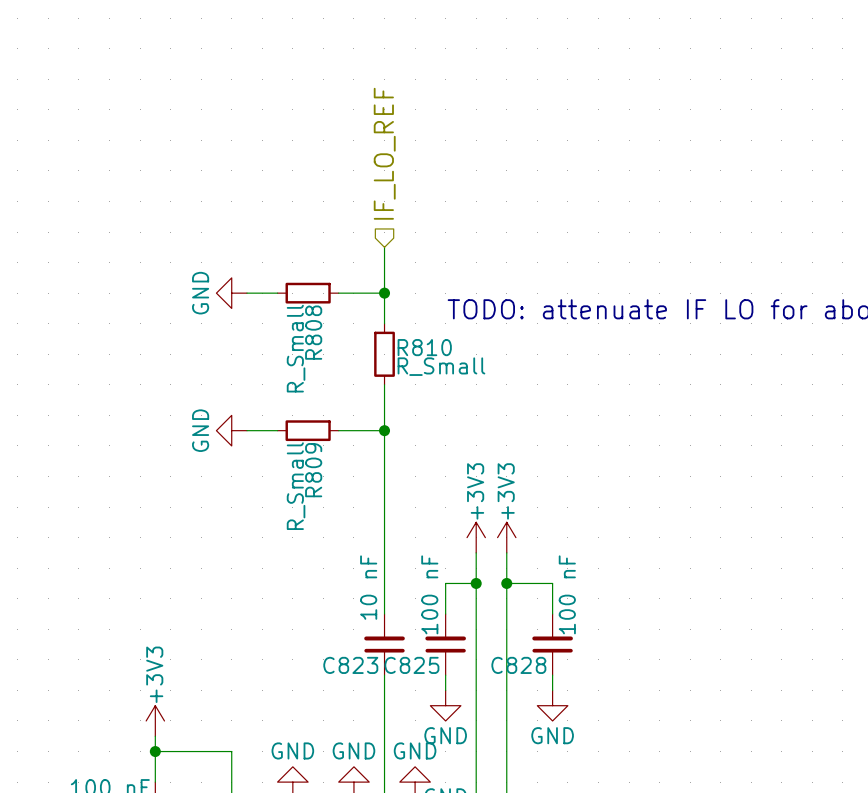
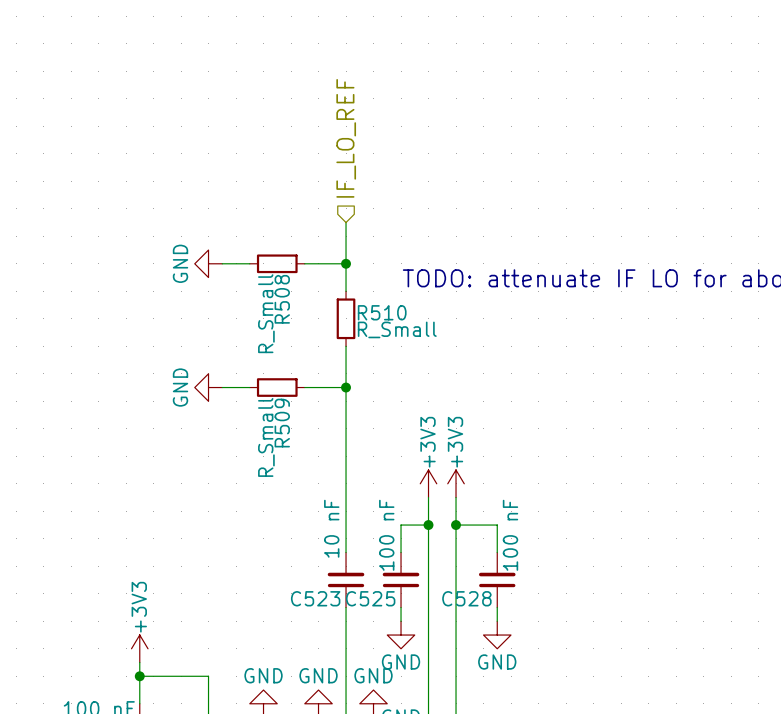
R808 name: R808 (313, 332) -> R508 (282, 299)
R810 name: R810 (424, 347) -> R510 (382, 312)
R809 name: R809 (313, 470) -> R509 (282, 423)
C823 name: C823 (350, 665) -> C523 (315, 598)
C825 name: C825 (411, 665) -> C525 (370, 598)
C828 name: C828 (518, 665) -> C528 (466, 598)

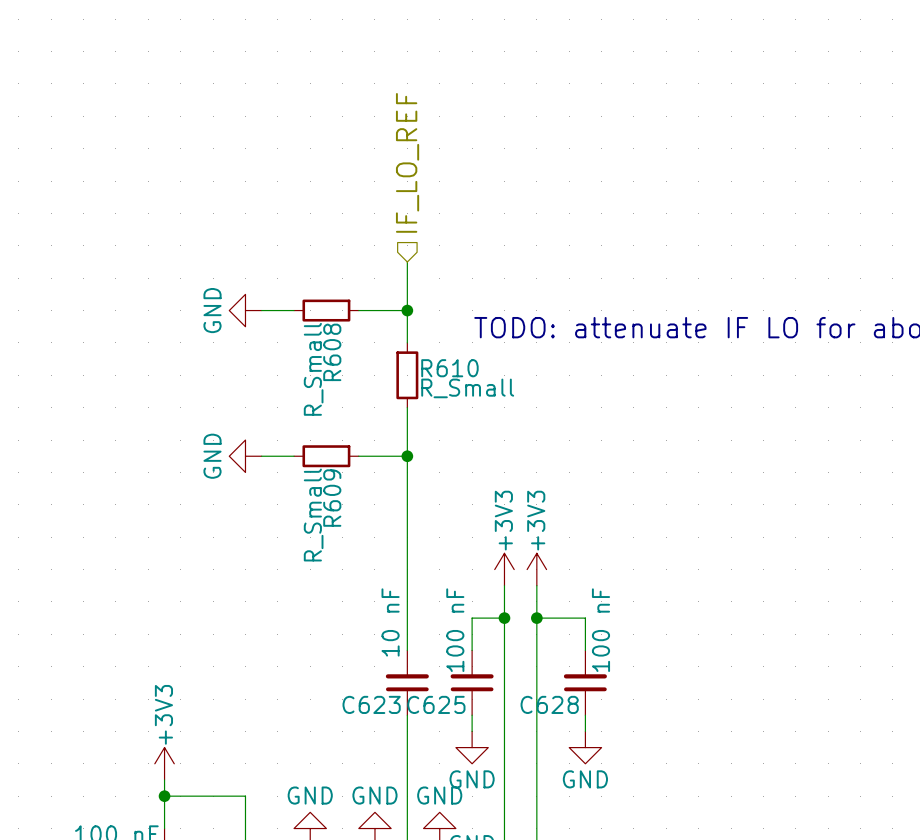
R508 name: R508 (282, 299) -> R608 (332, 352)
R510 name: R510 (382, 312) -> R610 (449, 368)
R509 name: R509 (282, 423) -> R609 (332, 498)
C523 name: C523 (315, 598) -> C623 (371, 704)
C525 name: C525 (370, 598) -> C625 (436, 704)
C528 name: C528 (466, 598) -> C628 (549, 704)

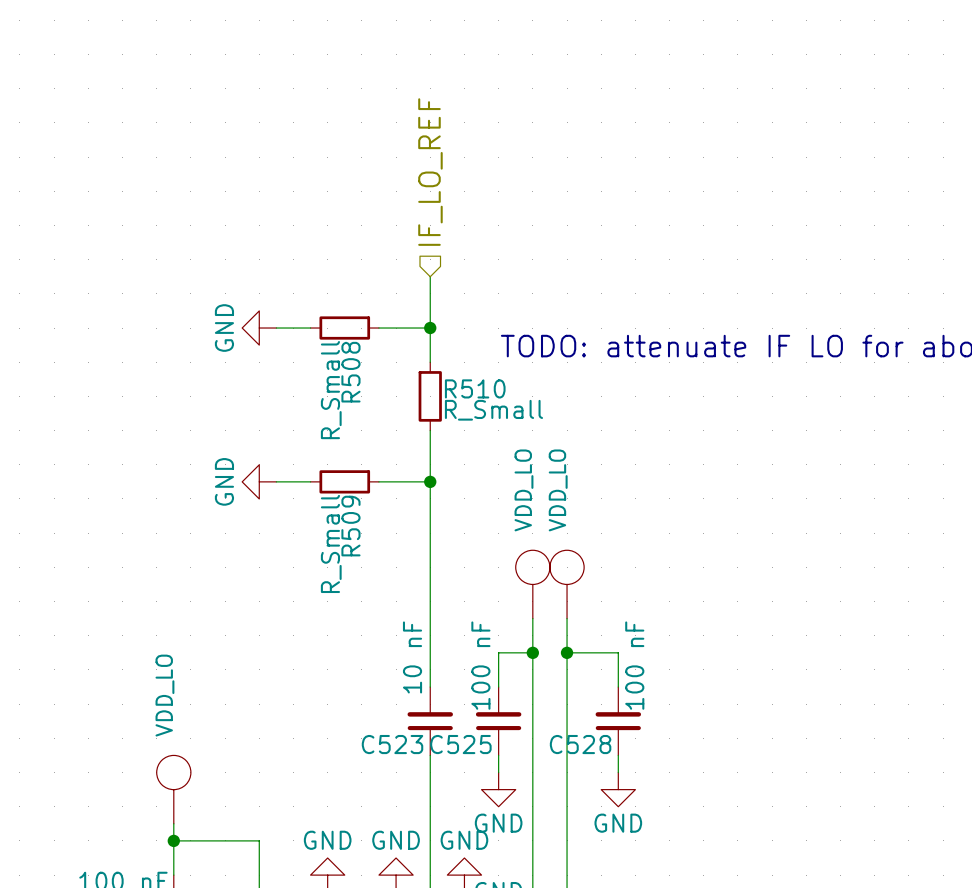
R608 name: R608 (332, 352) -> R508 (350, 372)
R610 name: R610 (449, 368) -> R510 (475, 388)
R609 name: R609 (332, 498) -> R509 (350, 526)
power symbol: none -> VDD_LO (532, 584)
power symbol: none -> VDD_LO (567, 584)
power symbol: +3V3 (504, 569) -> none
power symbol: +3V3 (536, 569) -> none
C623 name: C623 (371, 704) -> C523 (392, 744)
C625 name: C625 (436, 704) -> C525 (460, 744)
C628 name: C628 (549, 704) -> C528 (580, 744)
power symbol: none -> VDD_LO (173, 789)
power symbol: +3V3 (164, 763) -> none

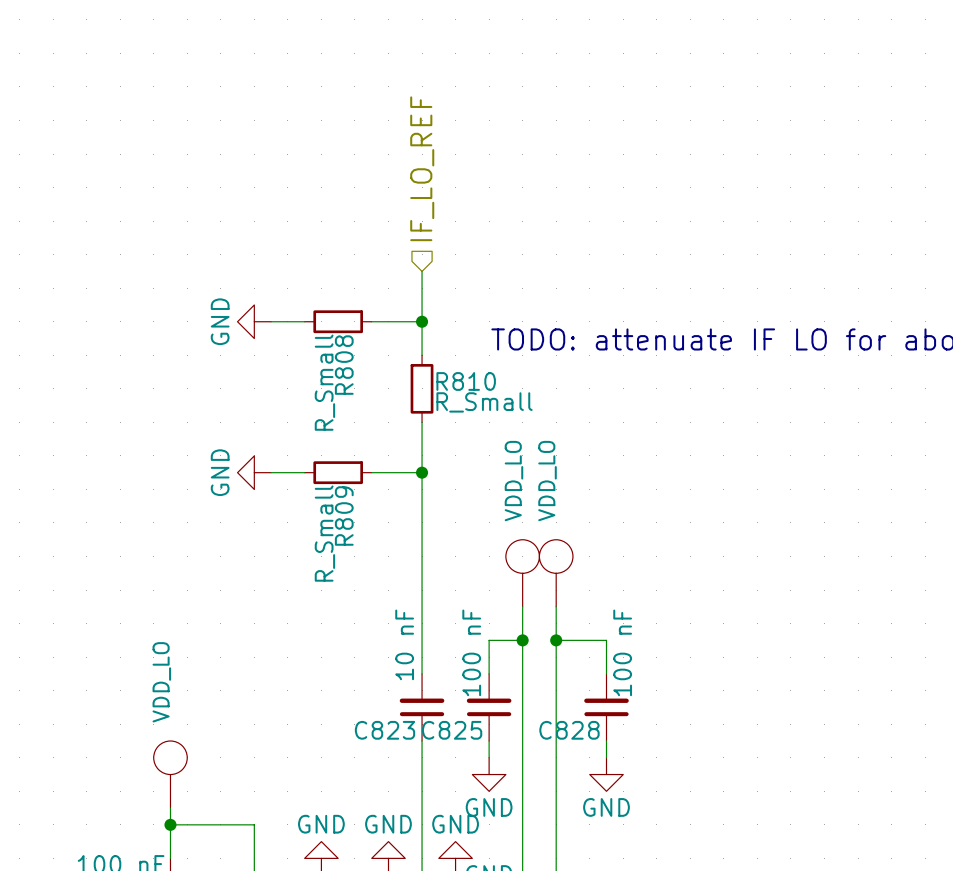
R508 name: R508 (350, 372) -> R808 (344, 365)
R510 name: R510 (475, 388) -> R810 (466, 381)
R509 name: R509 (350, 526) -> R809 (344, 516)
C523 name: C523 (392, 744) -> C823 (385, 730)
C525 name: C525 (460, 744) -> C825 (452, 730)
C528 name: C528 (580, 744) -> C828 (569, 730)

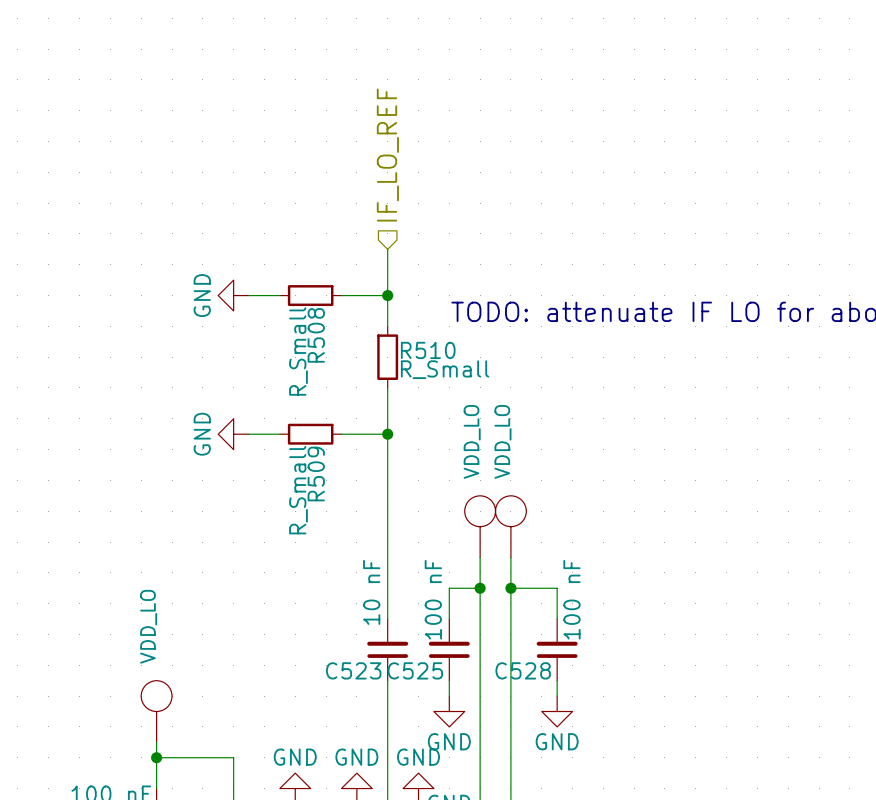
R808 name: R808 (344, 365) -> R508 (316, 335)
R810 name: R810 (466, 381) -> R510 (428, 350)
R809 name: R809 (344, 516) -> R509 (316, 474)
C823 name: C823 (385, 730) -> C523 (353, 670)
C825 name: C825 (452, 730) -> C525 (415, 670)
C828 name: C828 (569, 730) -> C528 (523, 670)

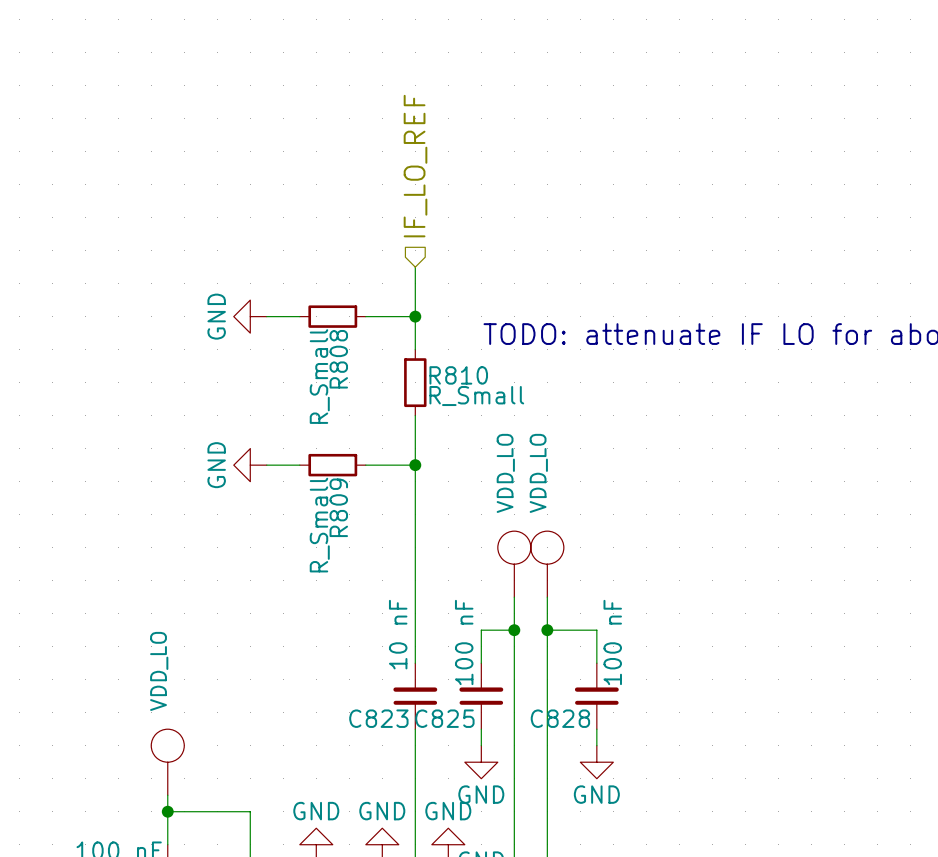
R508 name: R508 (316, 335) -> R808 (338, 359)
R510 name: R510 (428, 350) -> R810 (458, 375)
R509 name: R509 (316, 474) -> R809 (338, 507)
C523 name: C523 (353, 670) -> C823 (378, 718)
C525 name: C525 (415, 670) -> C825 (444, 718)
C528 name: C528 (523, 670) -> C828 (560, 718)

